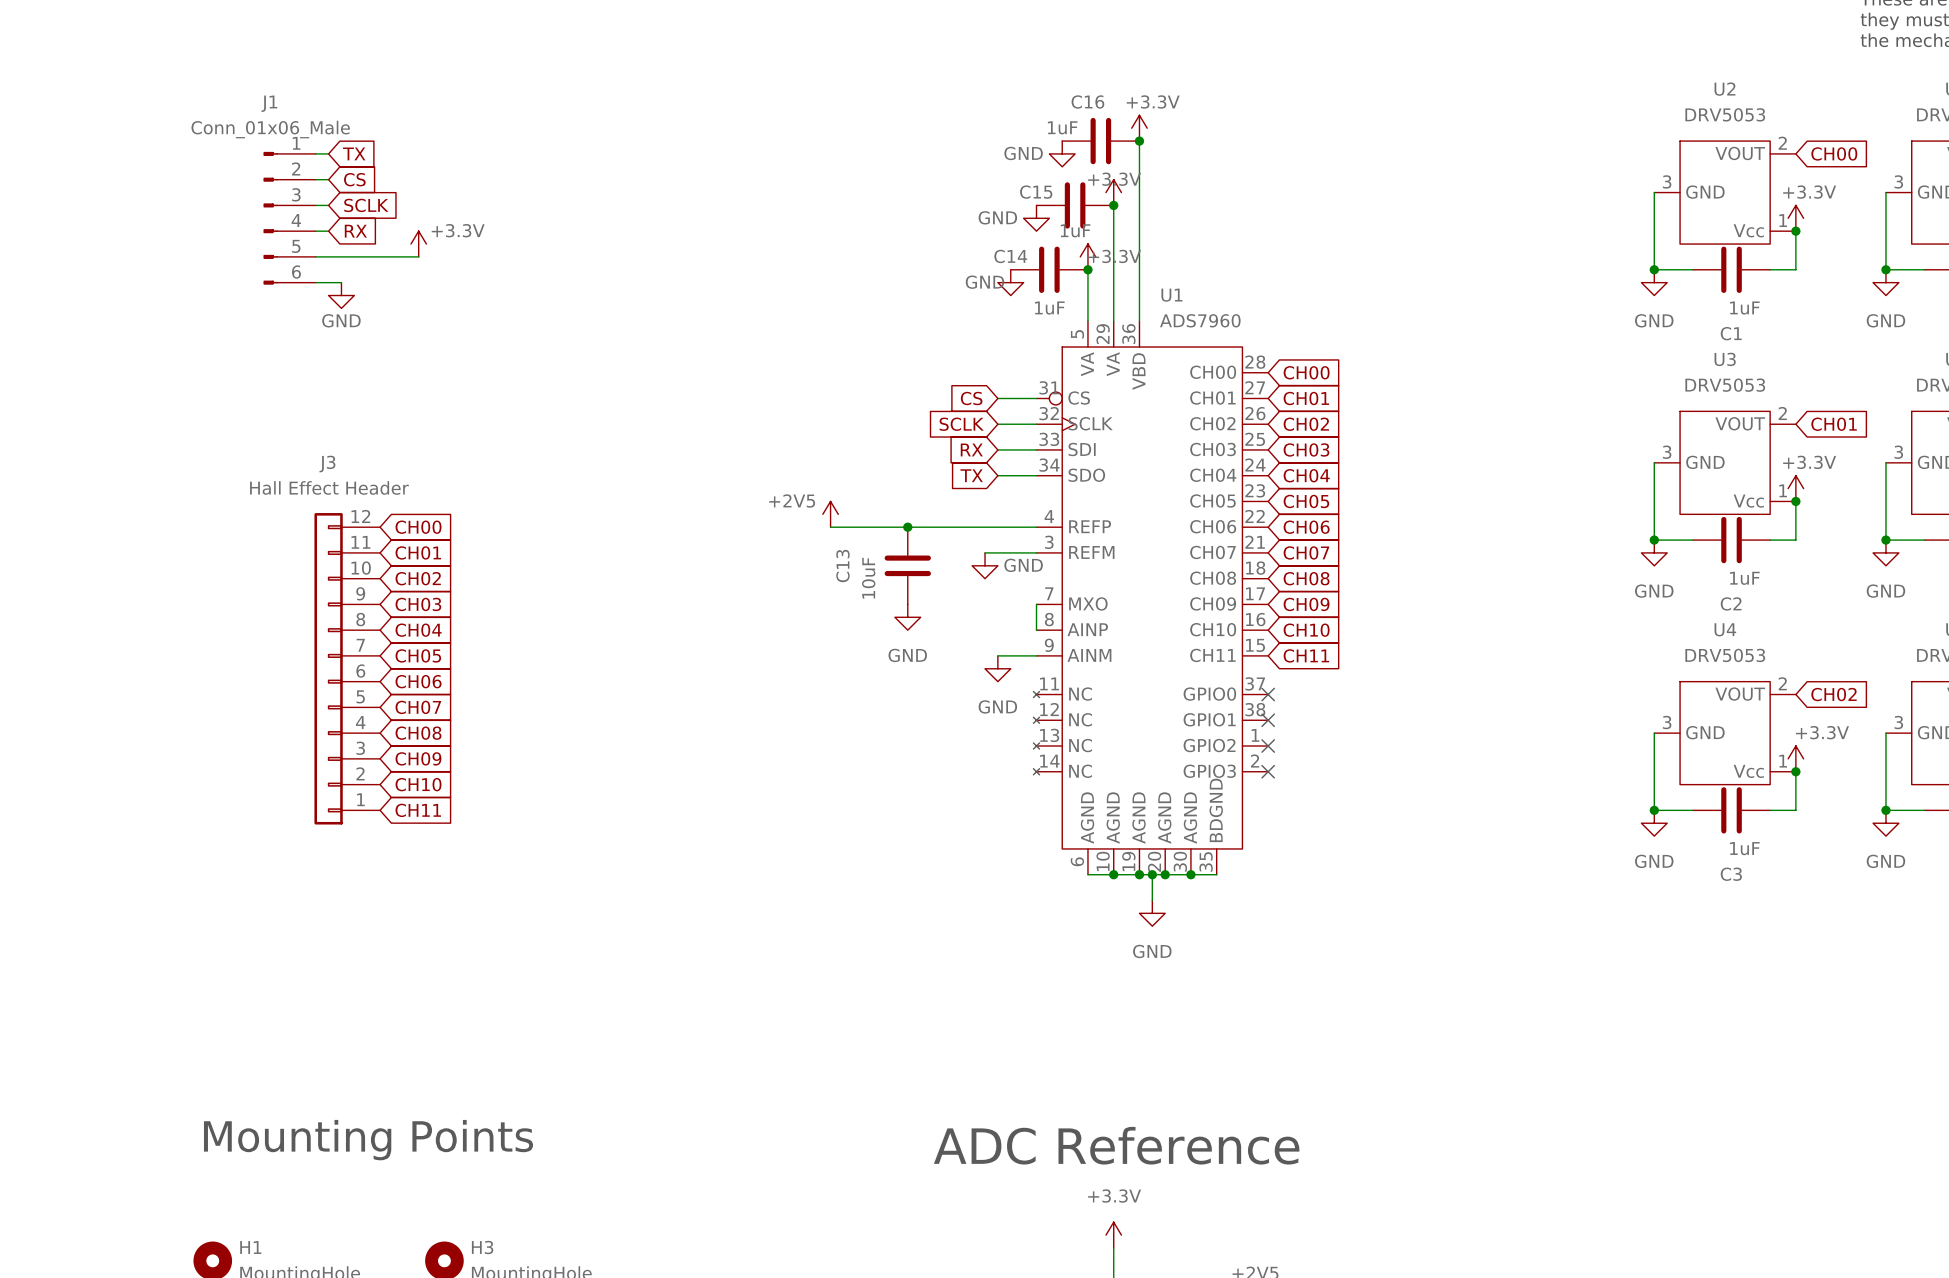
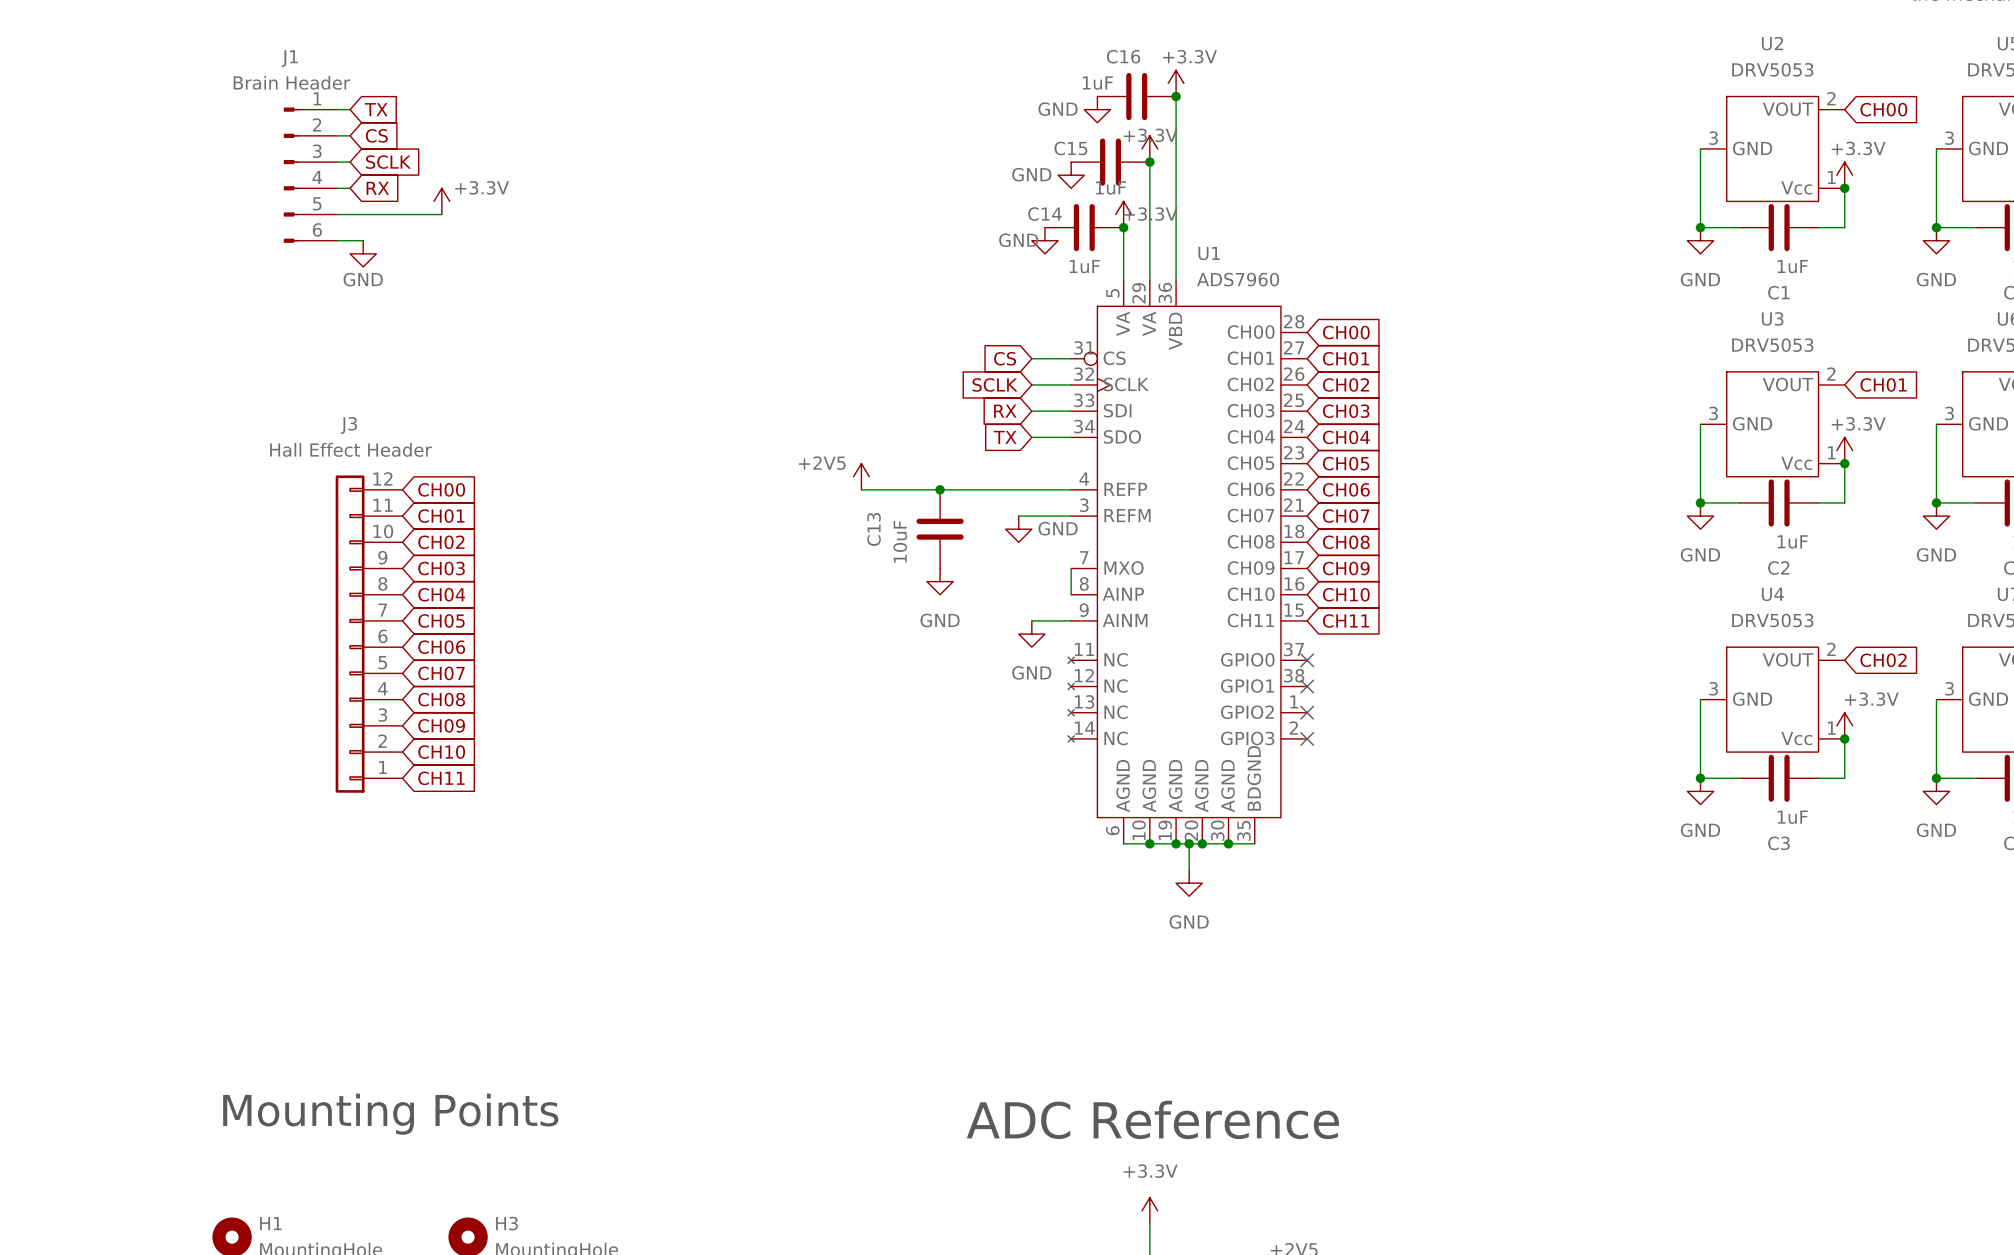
J1 value: Conn_01x06_Male (270, 129) -> Brain Header (291, 82)

